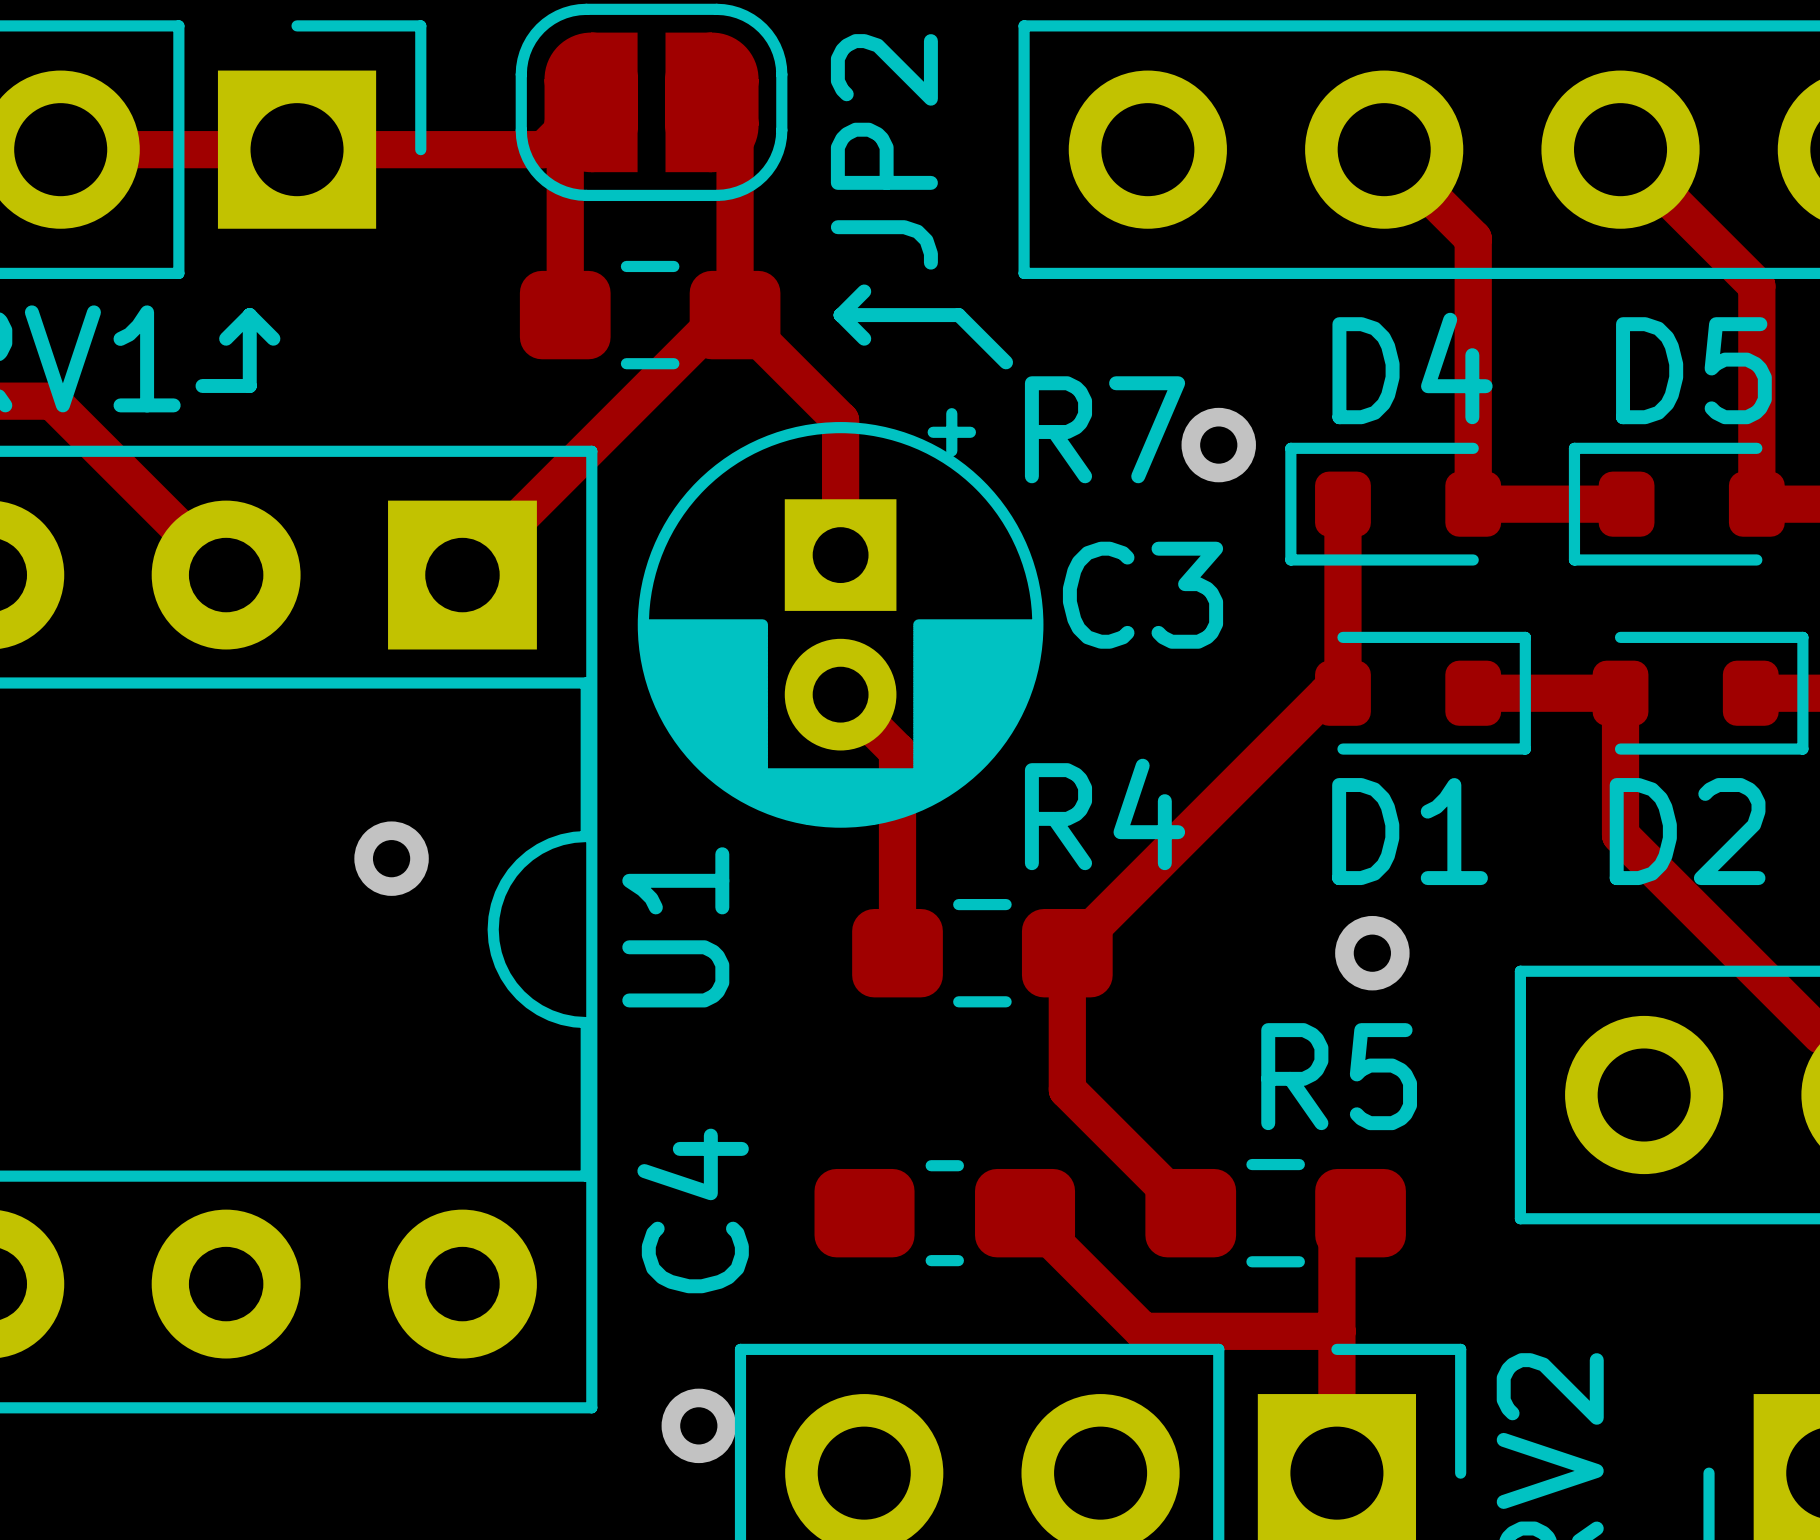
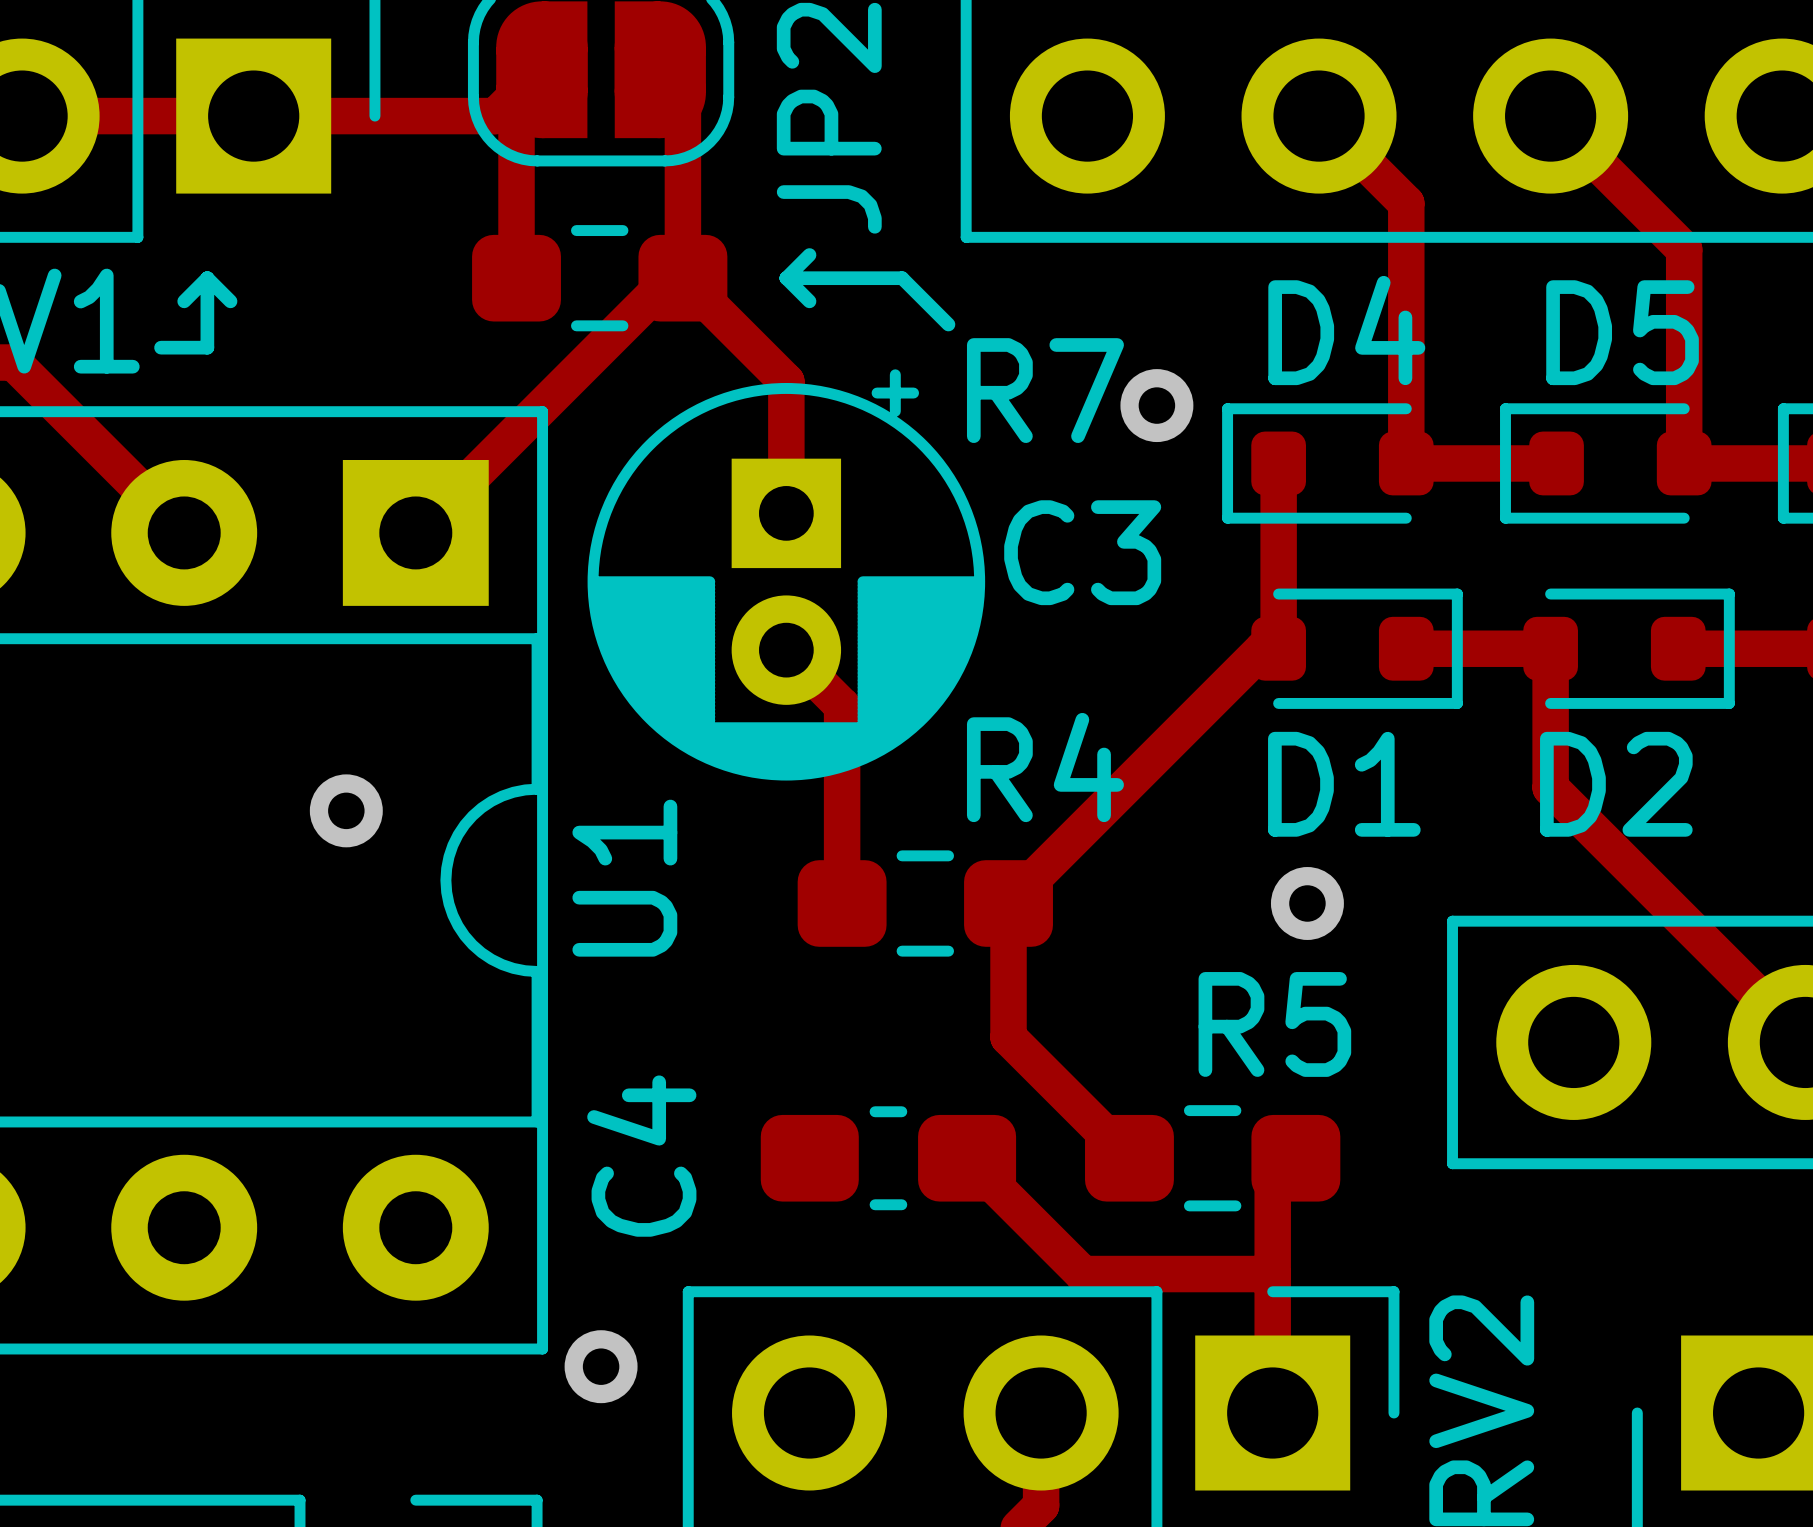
via position: (698, 1425) -> (601, 1366)

